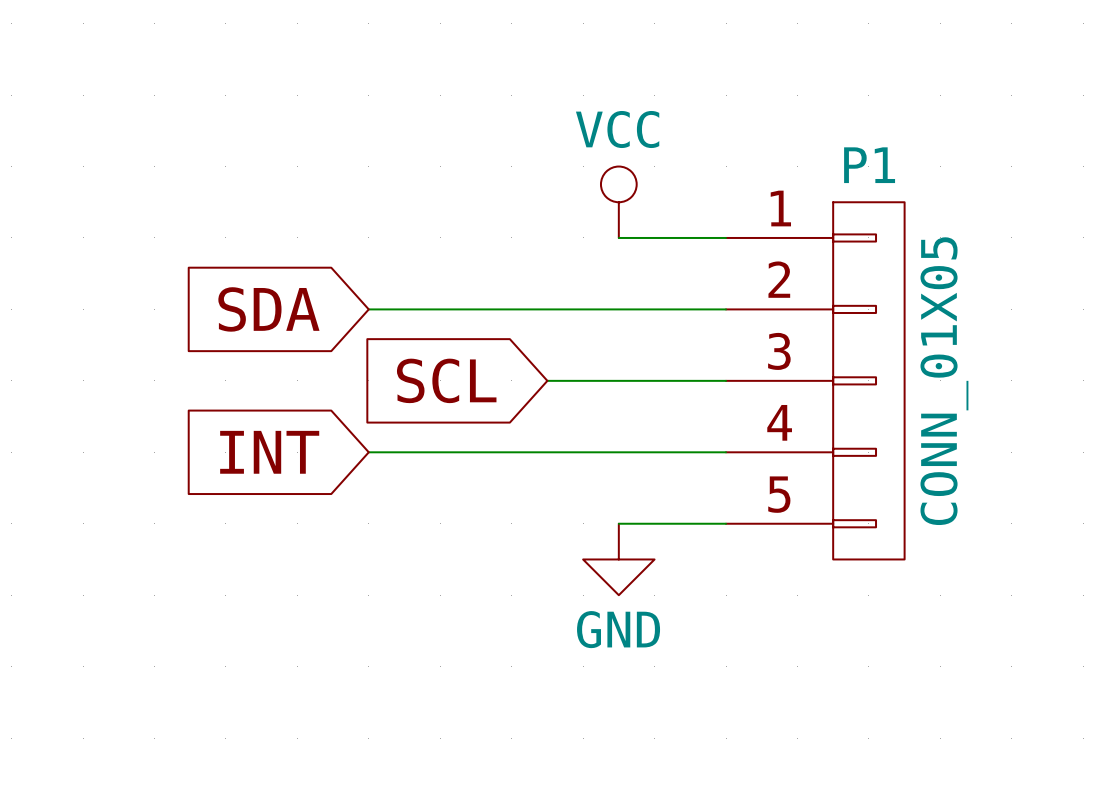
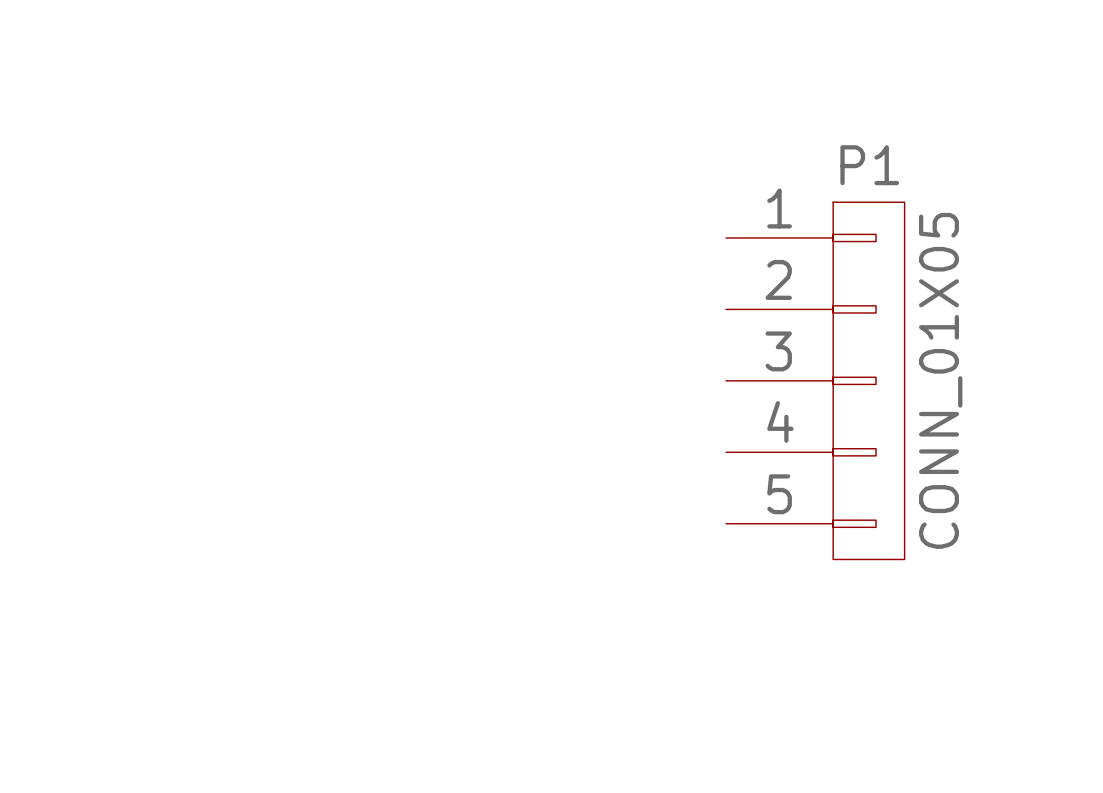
power symbol: VCC (618, 202) -> none
wire: (618, 237) (726, 237) -> none
global label: SDA (268, 309) -> none
wire: (368, 309) (726, 309) -> none
global label: SCL (446, 380) -> none
wire: (547, 380) (726, 380) -> none
global label: INT (269, 452) -> none
wire: (368, 452) (726, 452) -> none
wire: (618, 523) (726, 523) -> none
power symbol: GND (618, 559) -> none

